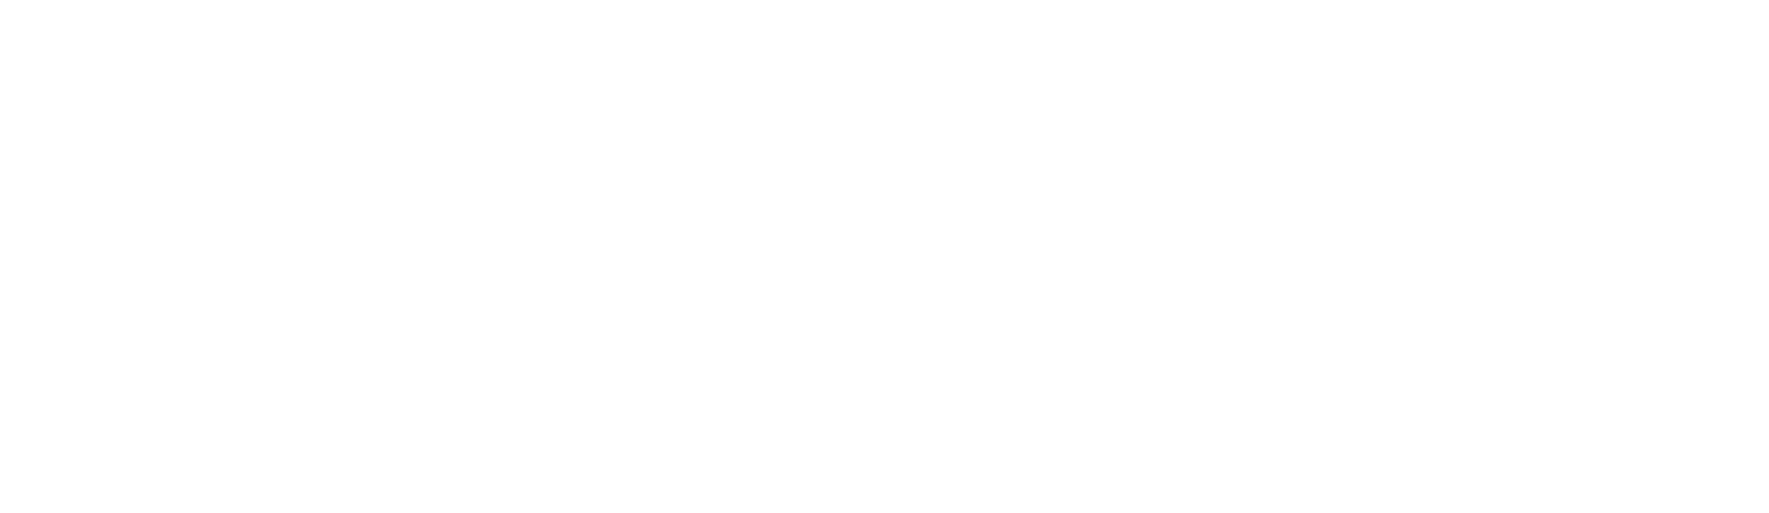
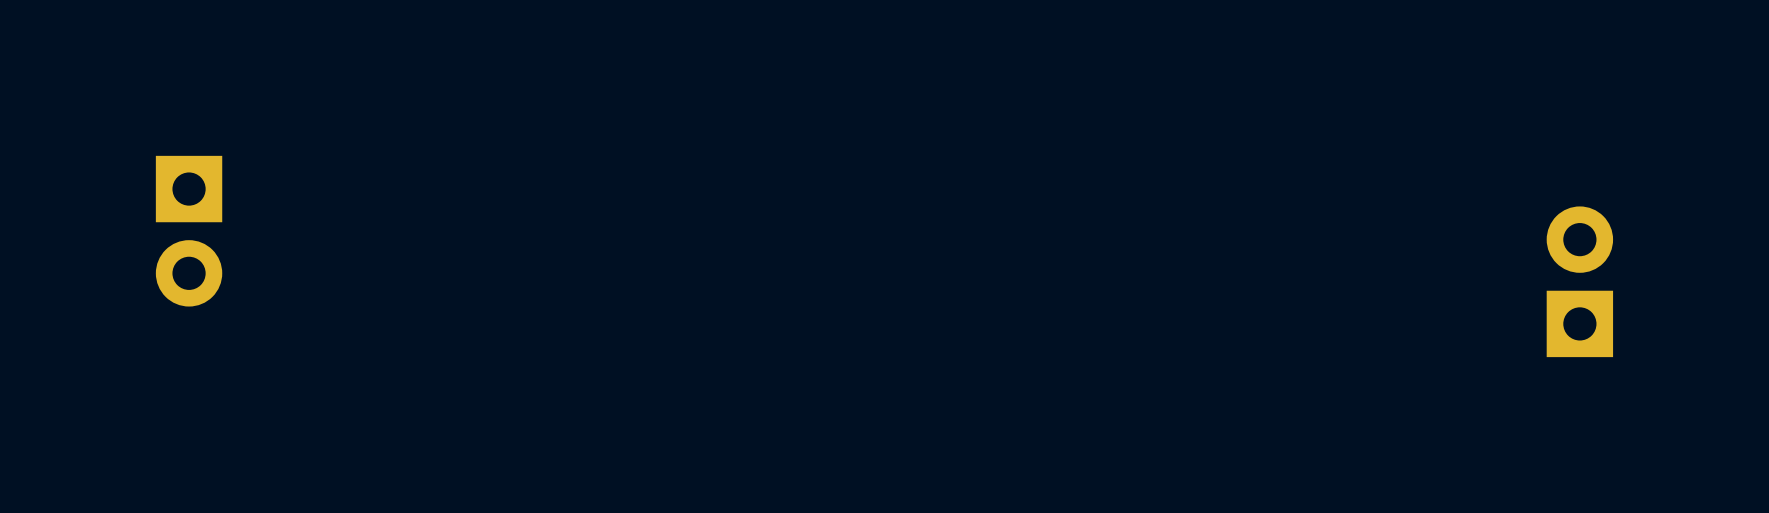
part: none -> (189, 231)
part: none -> (1579, 281)

